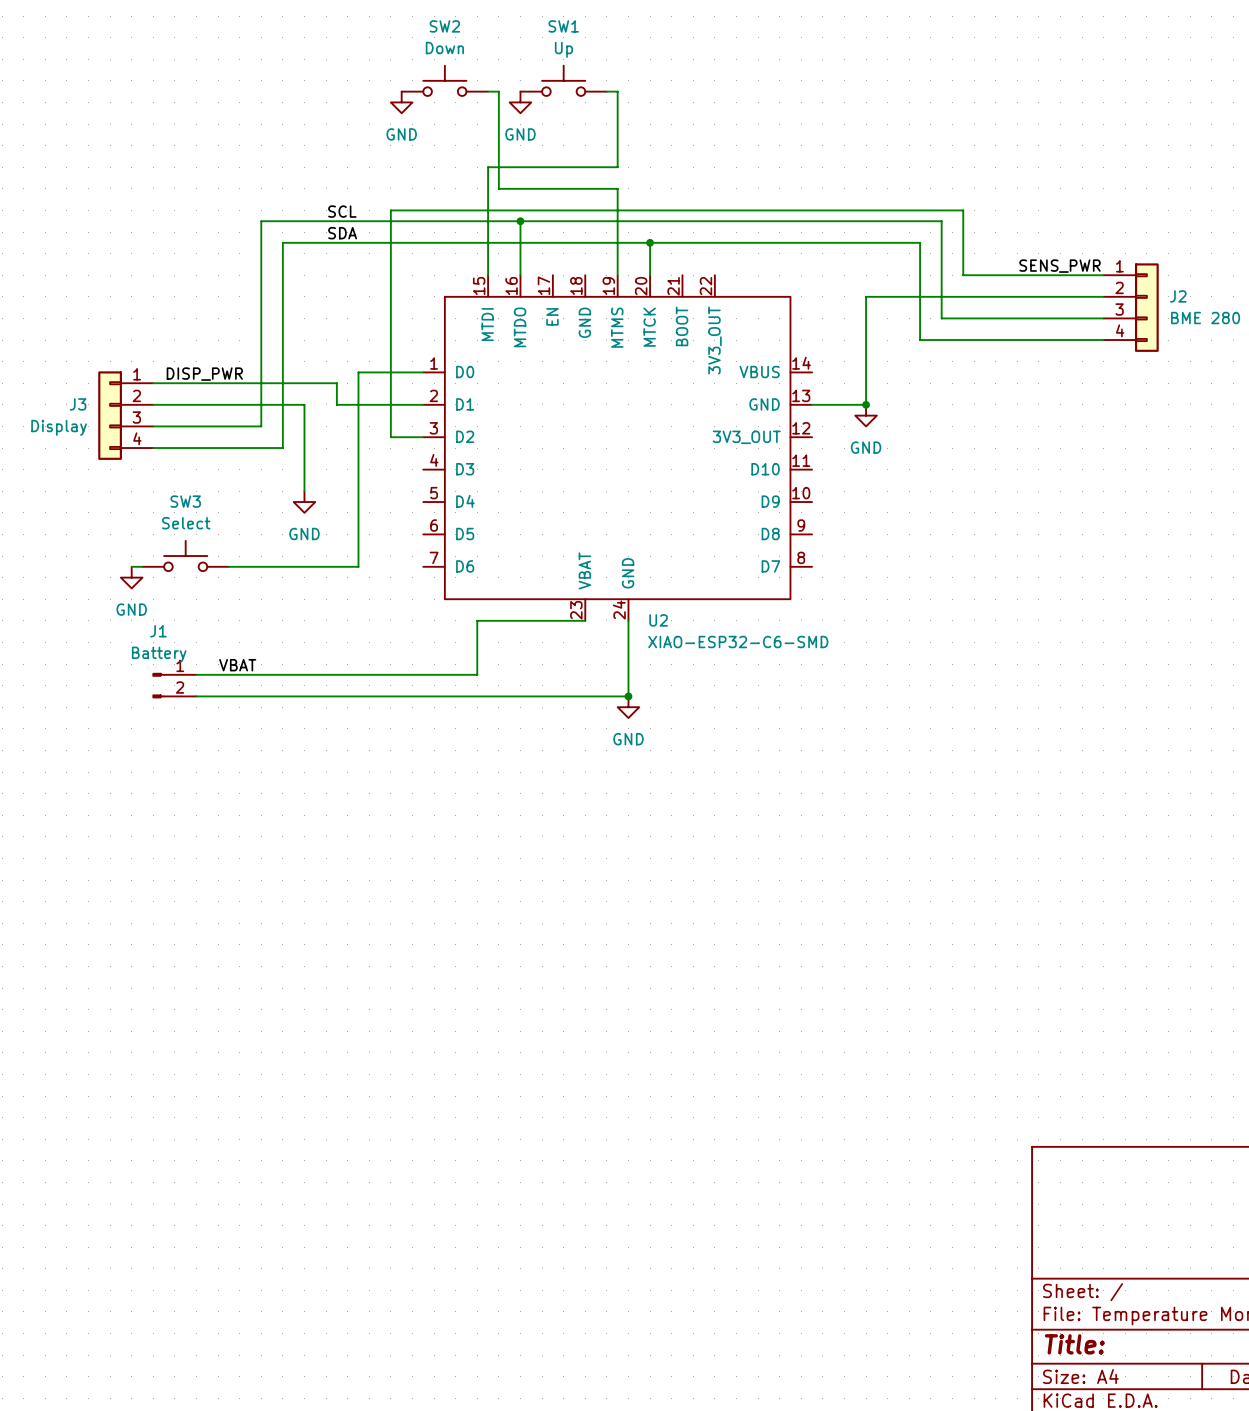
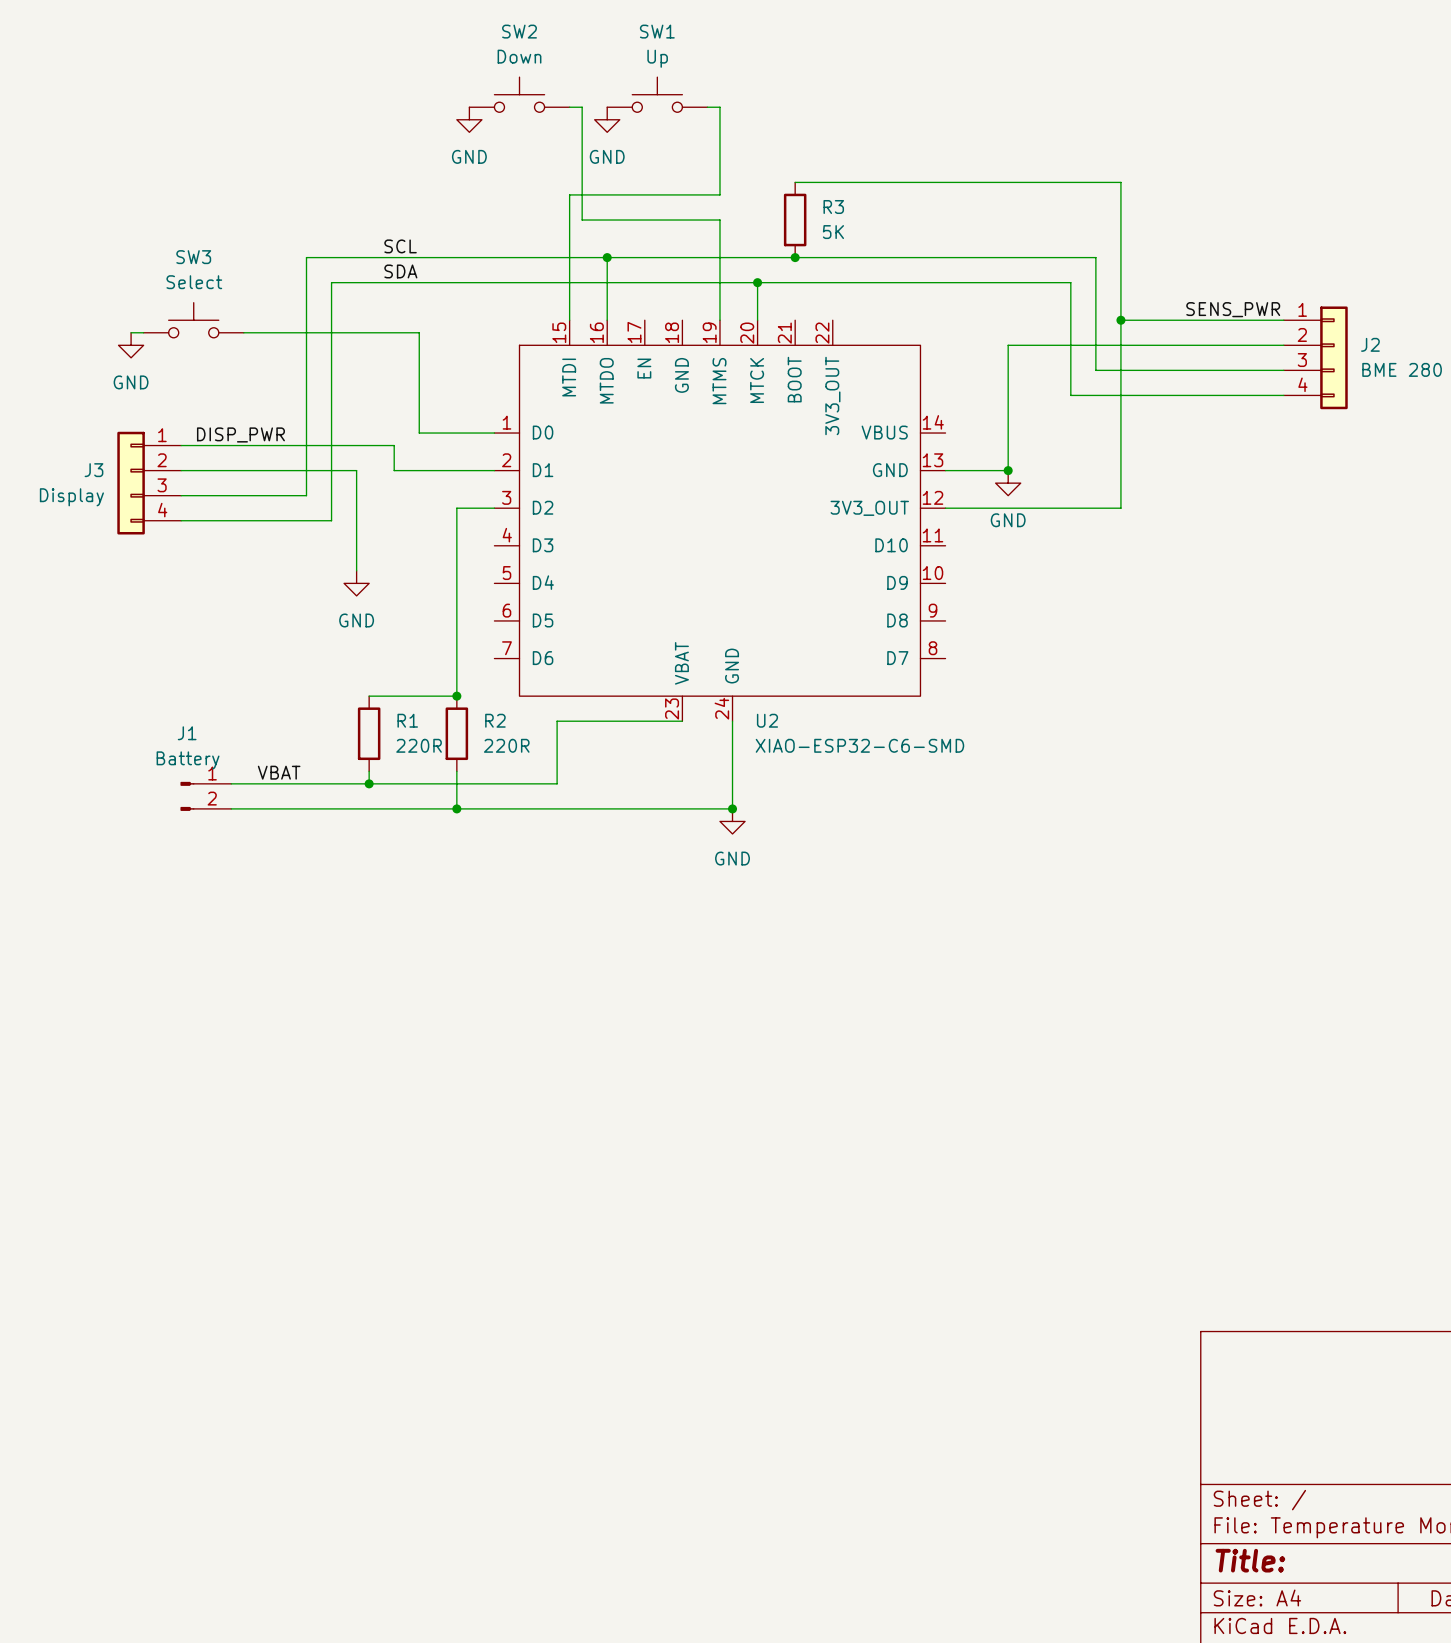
R3: none -> 5K (795, 220)
wire: (963, 210) (390, 210) (390, 437) -> (1120, 245) (1120, 182) (795, 182)
junction: none -> (795, 257)
wire: none -> (1120, 320) (1120, 508) (945, 508)
junction: none -> (1120, 320)
wire: none -> (131, 332) (143, 332)
power symbol: none -> GND (131, 345)
wire: (358, 372) (358, 566) (228, 566) -> (419, 433) (419, 332) (243, 332)
wire: none -> (456, 508) (456, 696) (369, 696)
SW3 position: (185, 556) -> (193, 320)
wire: (131, 566) (142, 566) -> none
power symbol: GND (131, 577) -> none
junction: none -> (456, 696)
R1: none -> 220R (369, 733)
R2: none -> 220R (456, 733)
wire: none -> (369, 771) (369, 783)
wire: none -> (456, 771) (456, 808)
junction: none -> (369, 783)
junction: none -> (456, 808)

